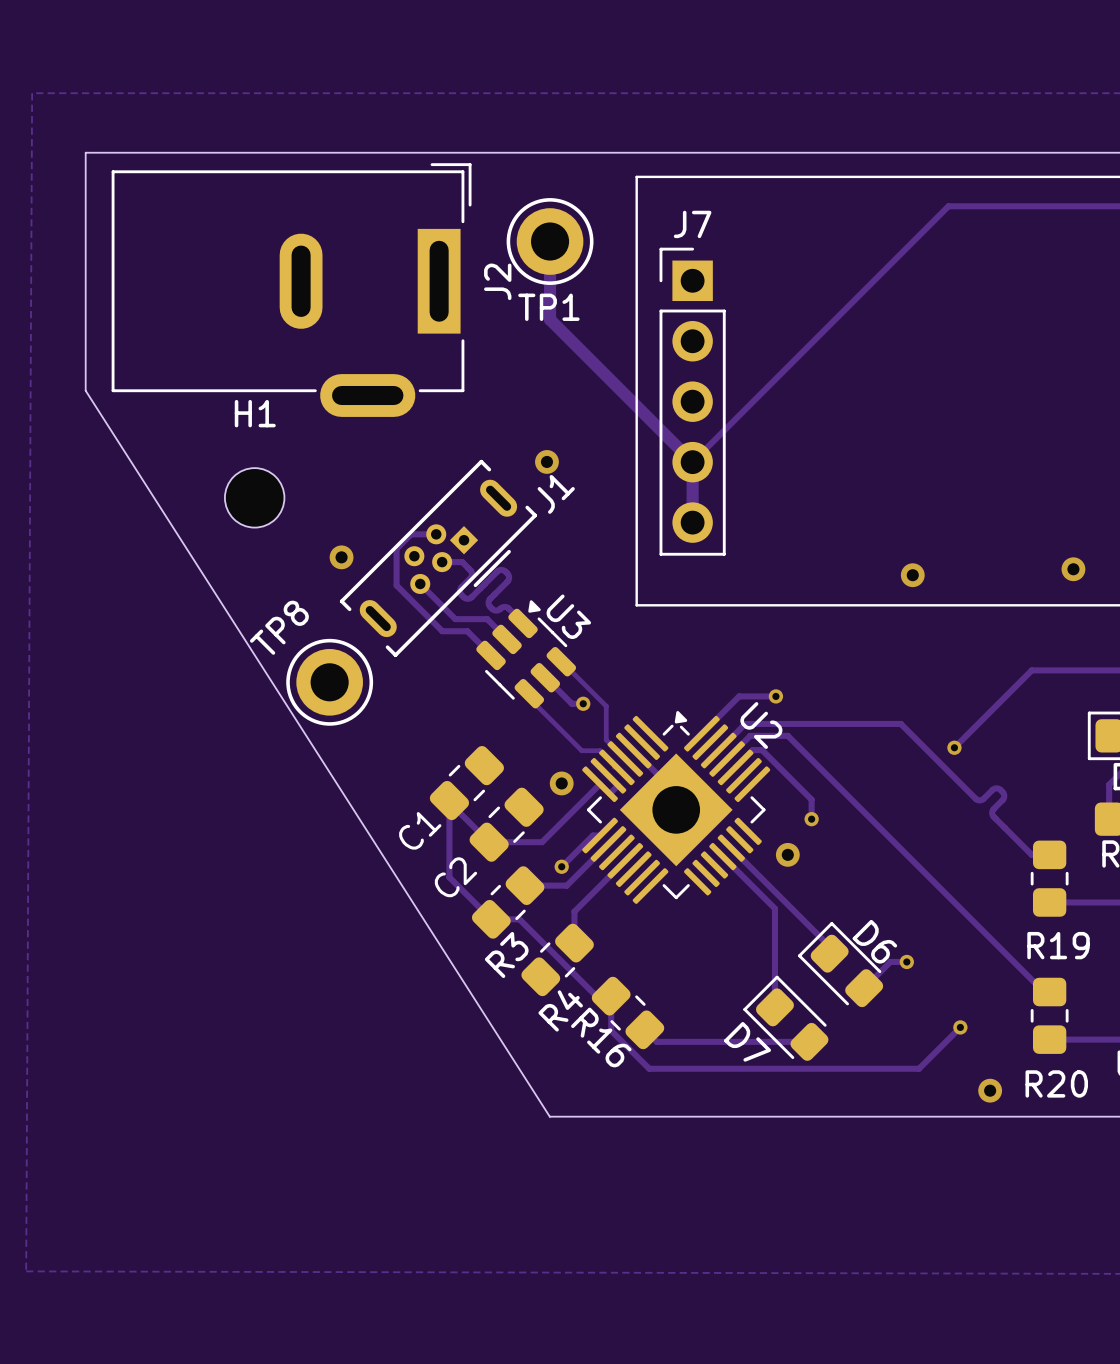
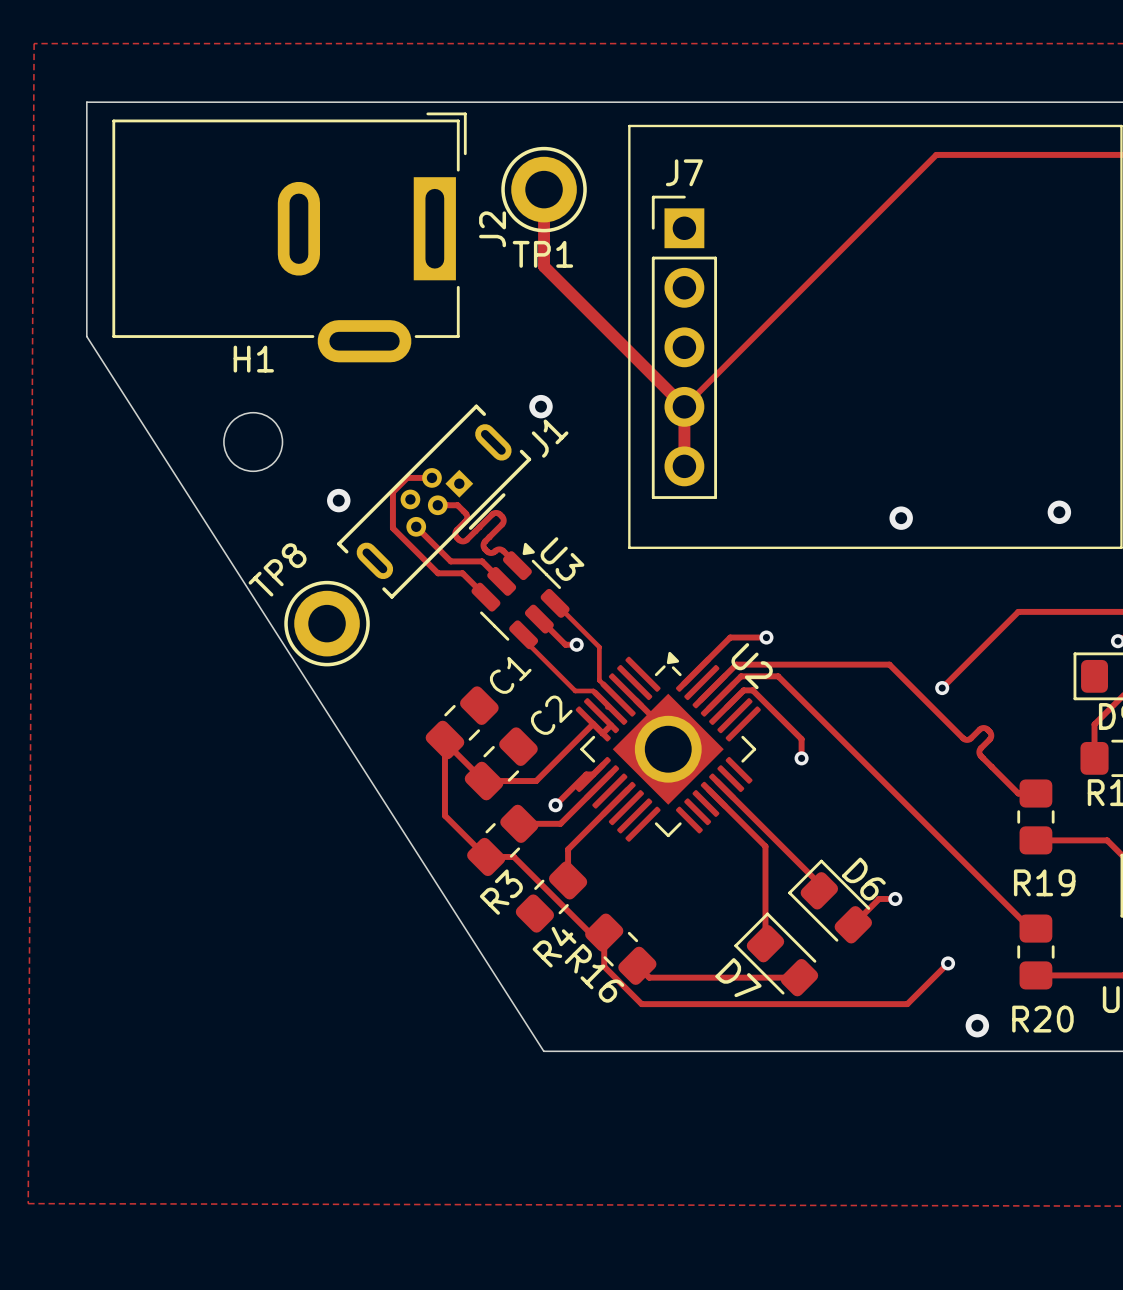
via: (561, 783) -> none
C1 name position: C1 (420, 830) -> C1 (510, 675)
via: (787, 854) -> none
C2 name position: C2 (455, 877) -> C2 (551, 715)

